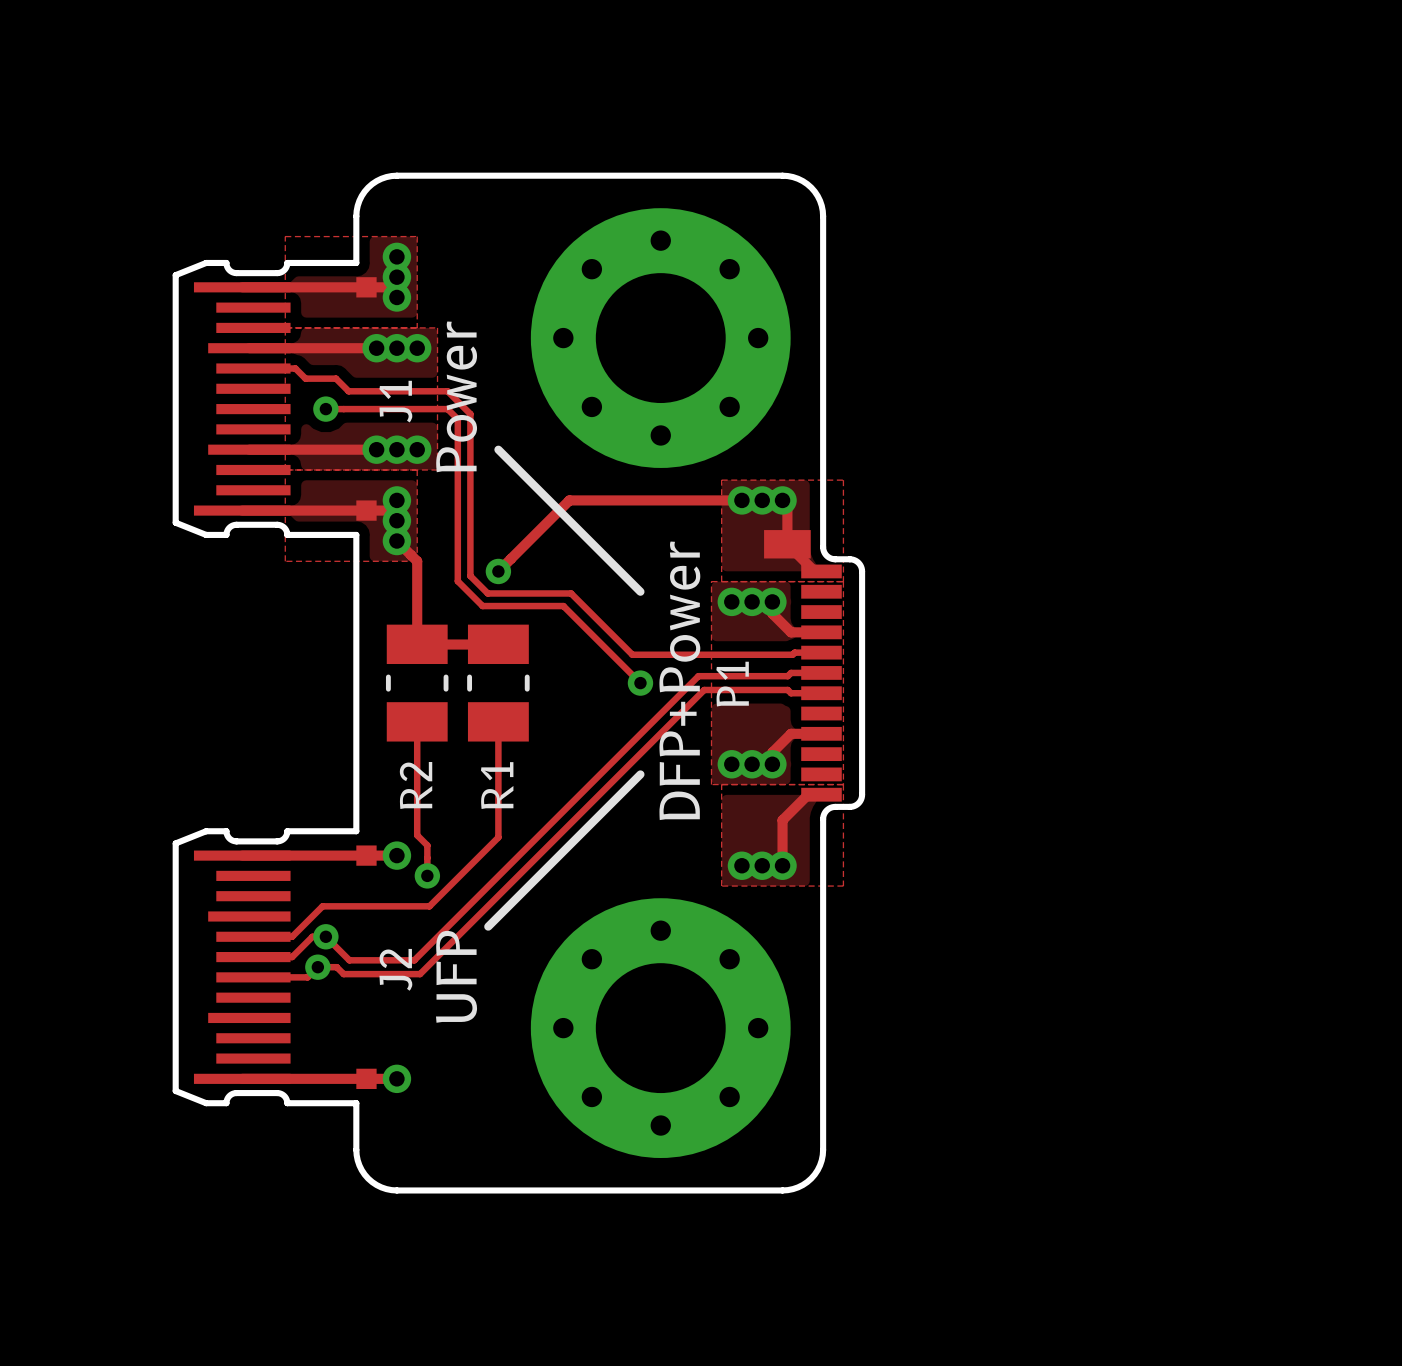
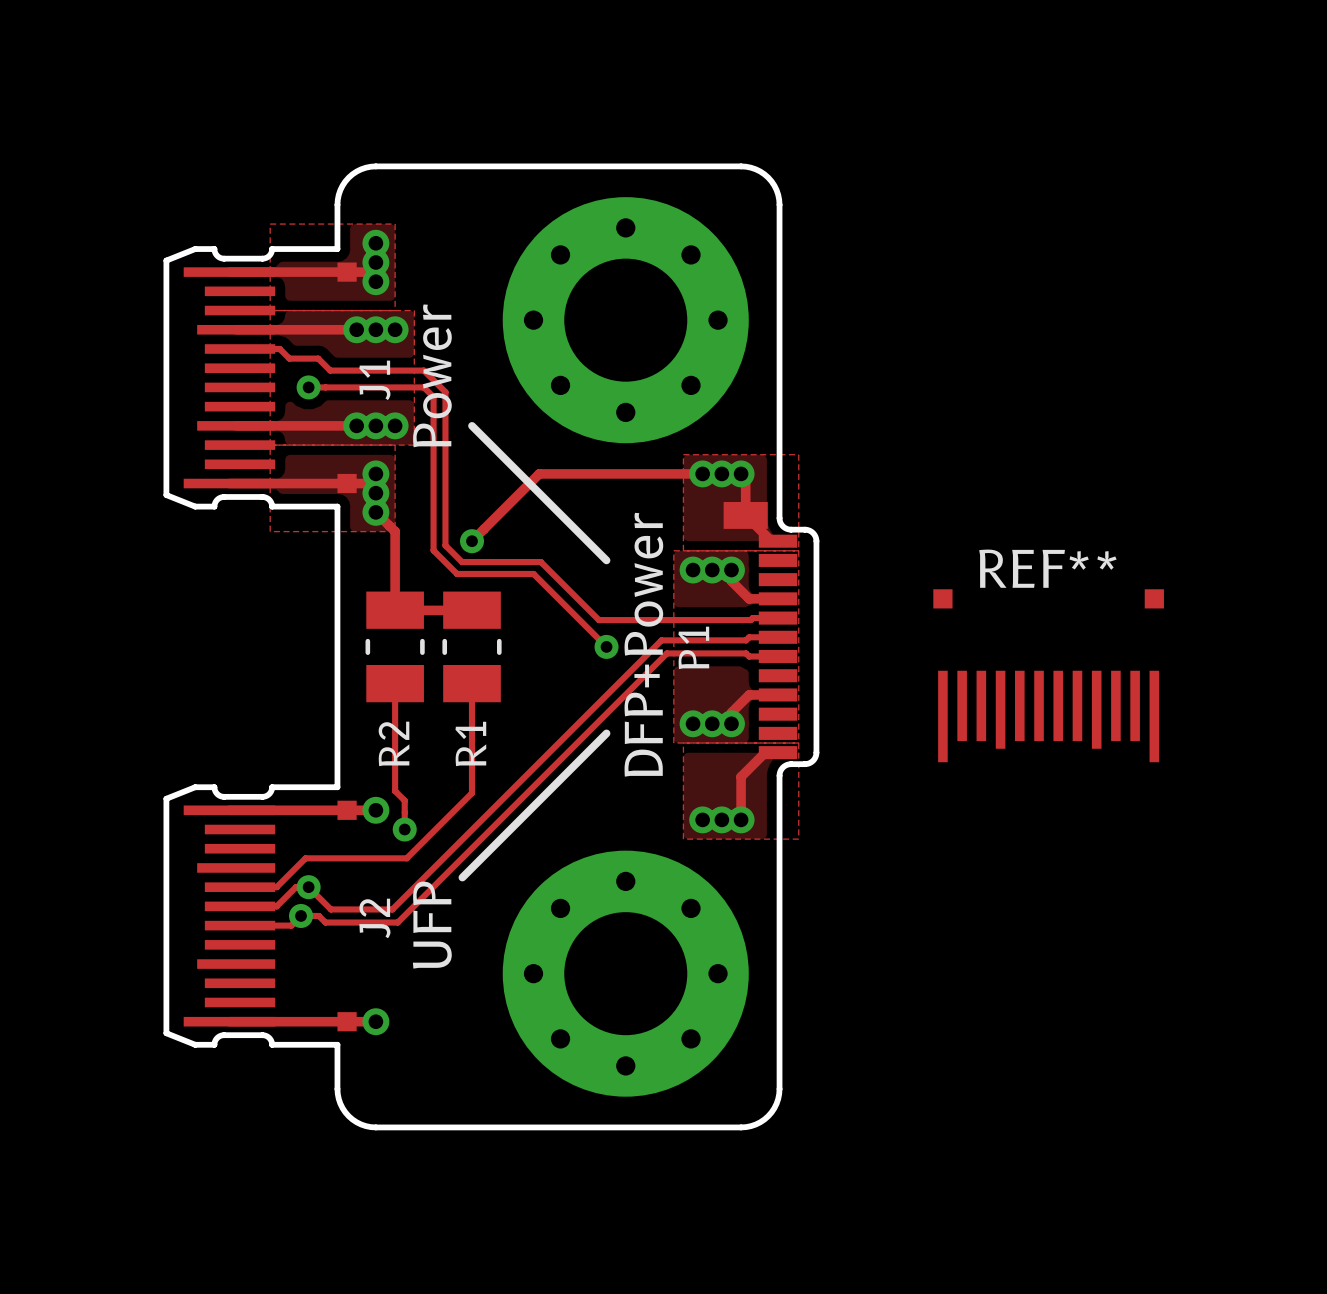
REF**: none -> (1048, 675)

